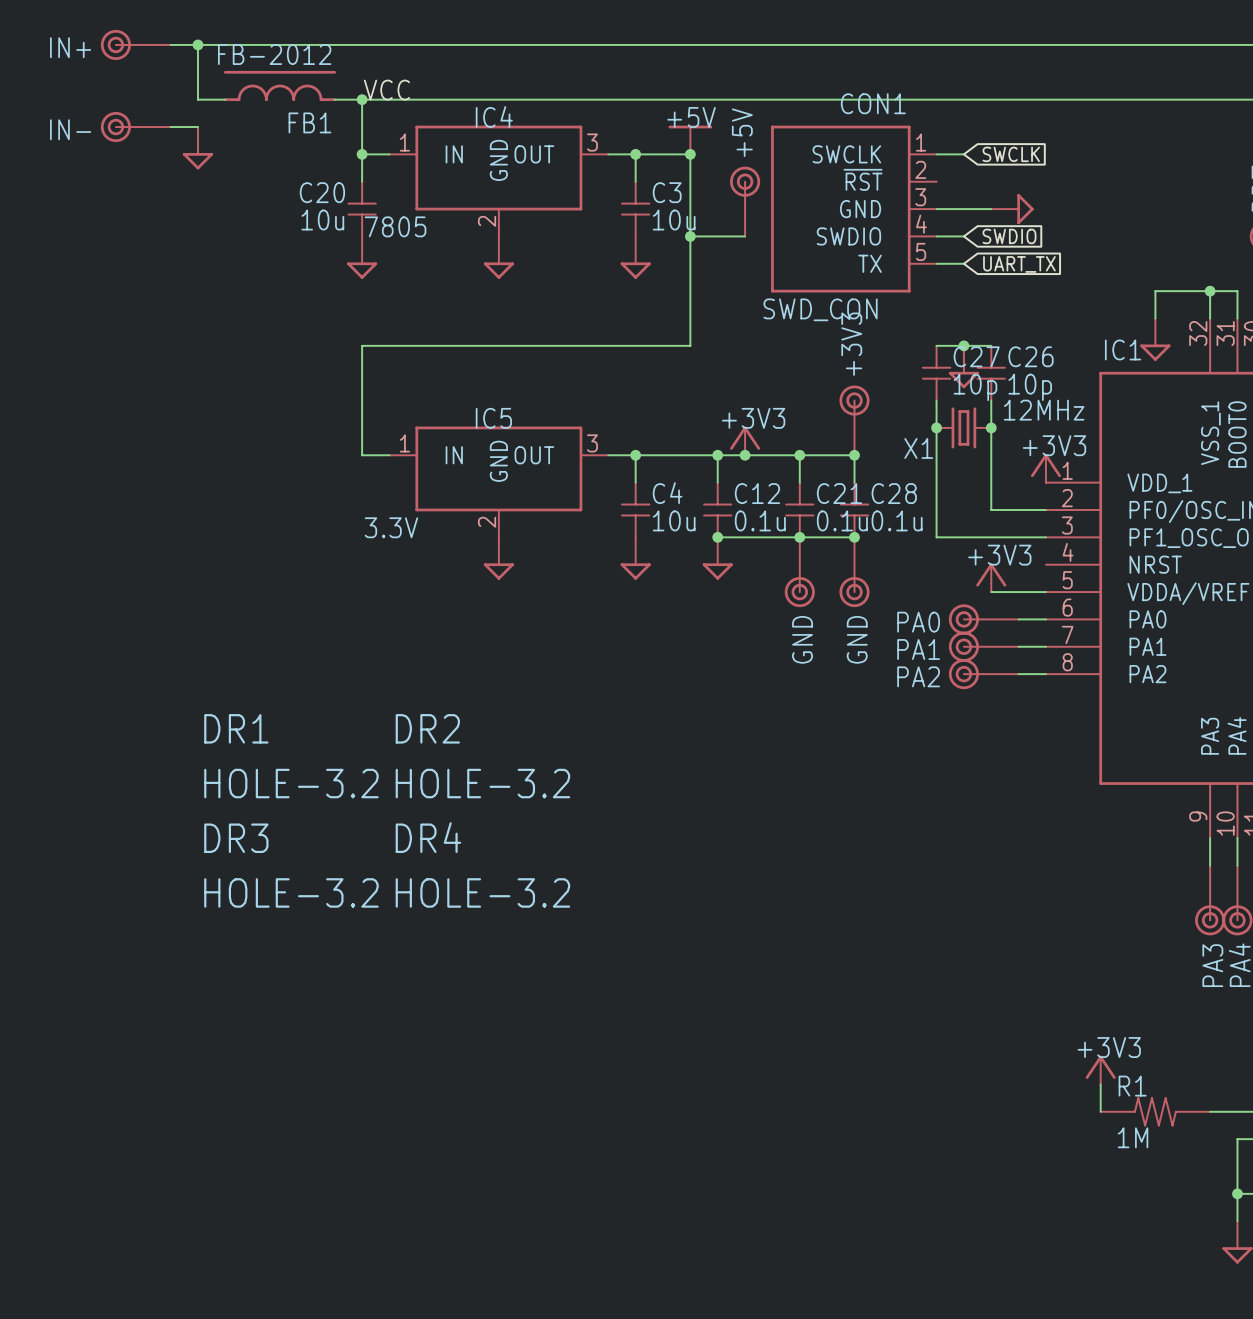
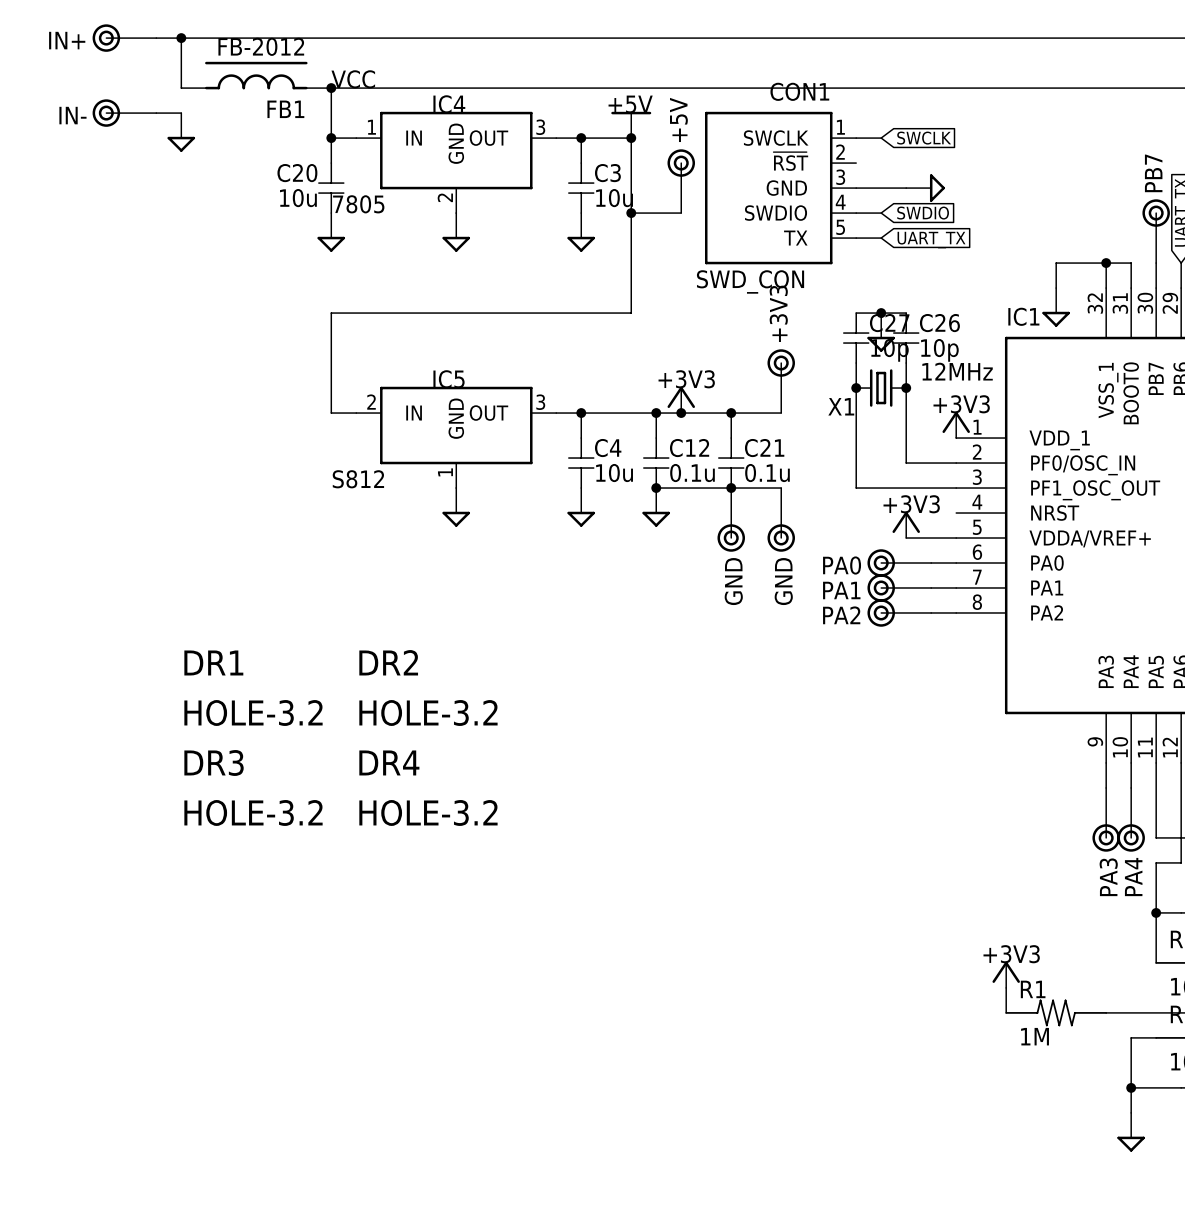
IC5 pin number: 1 (404, 443) -> 2 (371, 402)
wire: (854, 455) (854, 482) -> none
junction: (854, 455) -> none
C28: 0.1u (854, 509) -> none
IC5 pin number: 2 (487, 522) -> 1 (445, 472)
IC5 value: 3.3V (391, 527) -> S812 (358, 479)
junction: (854, 537) -> none

